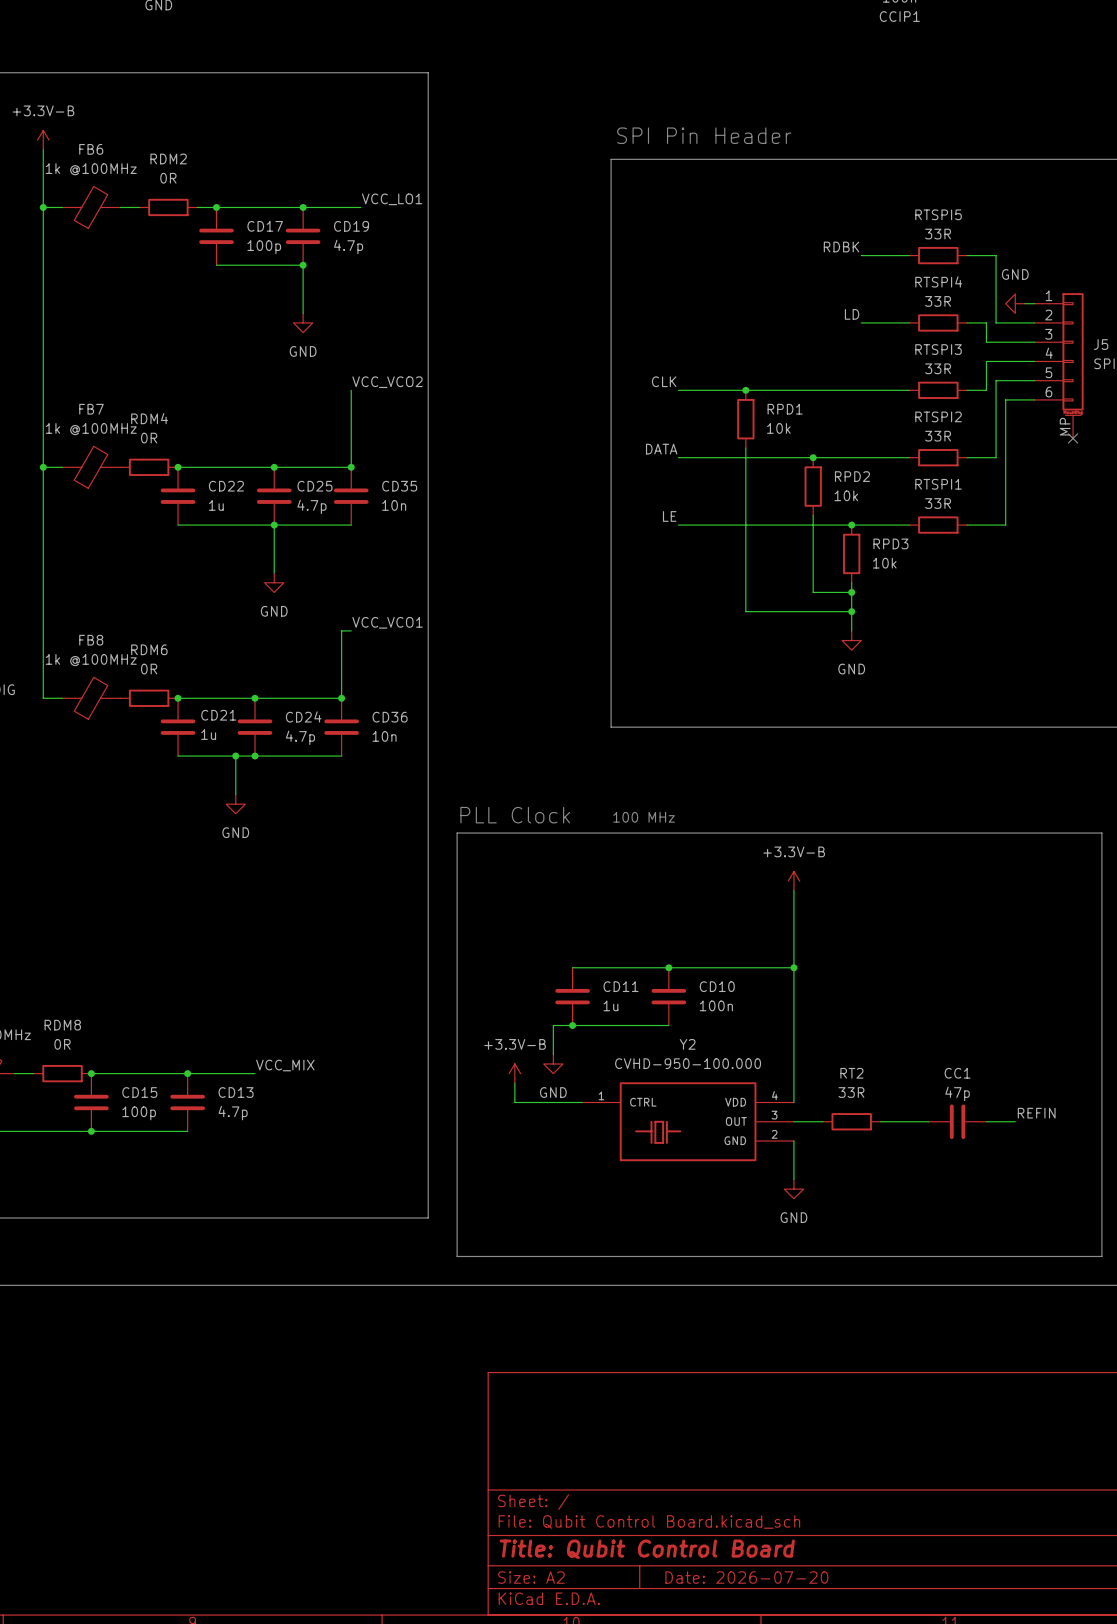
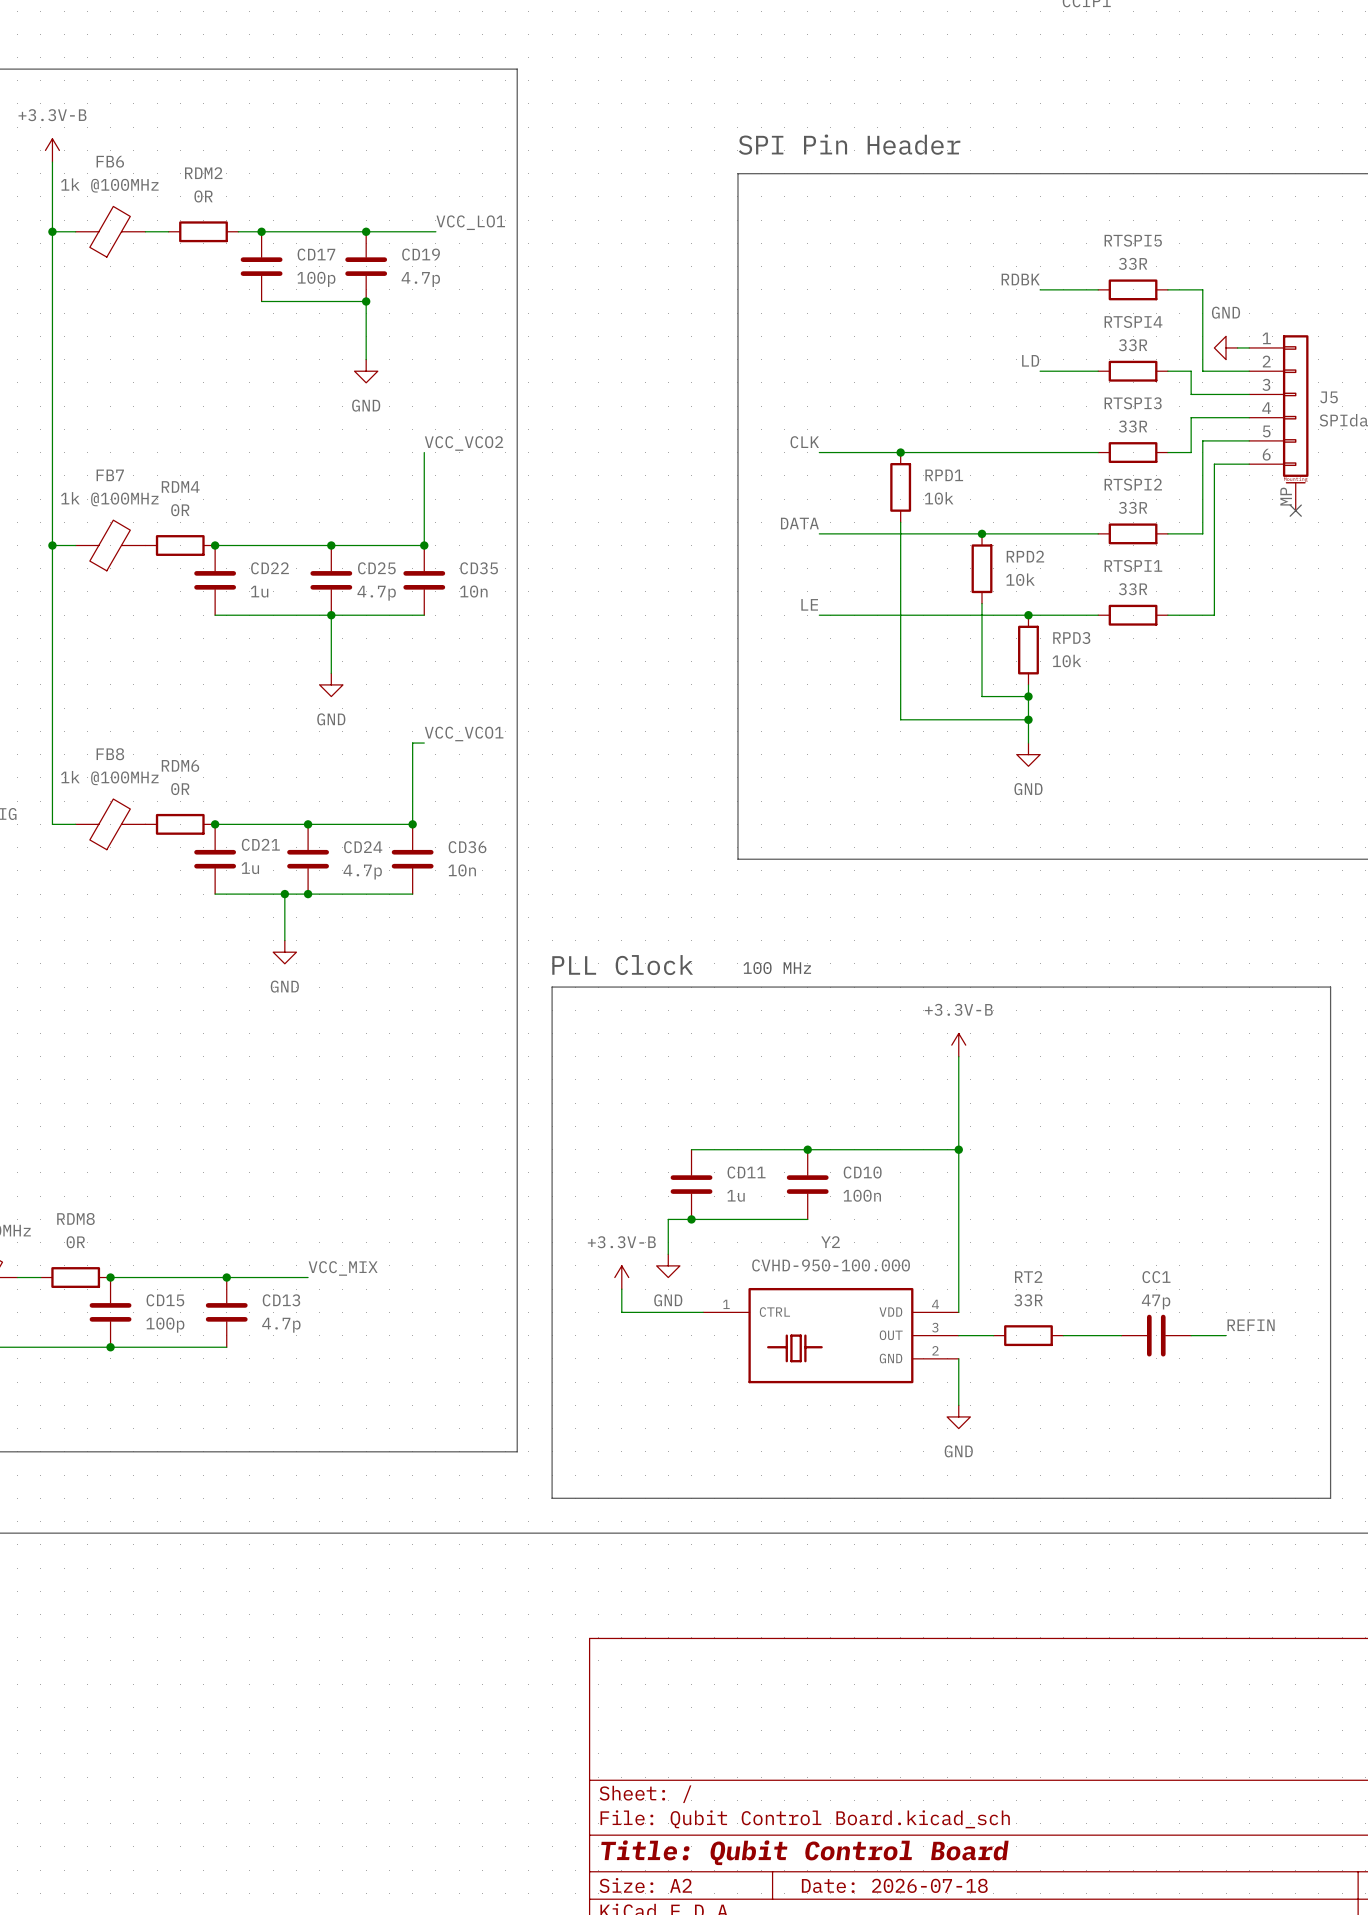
title block: Date: 2026-07-20 (746, 1577) -> Date: 2026-07-18 (894, 1885)

